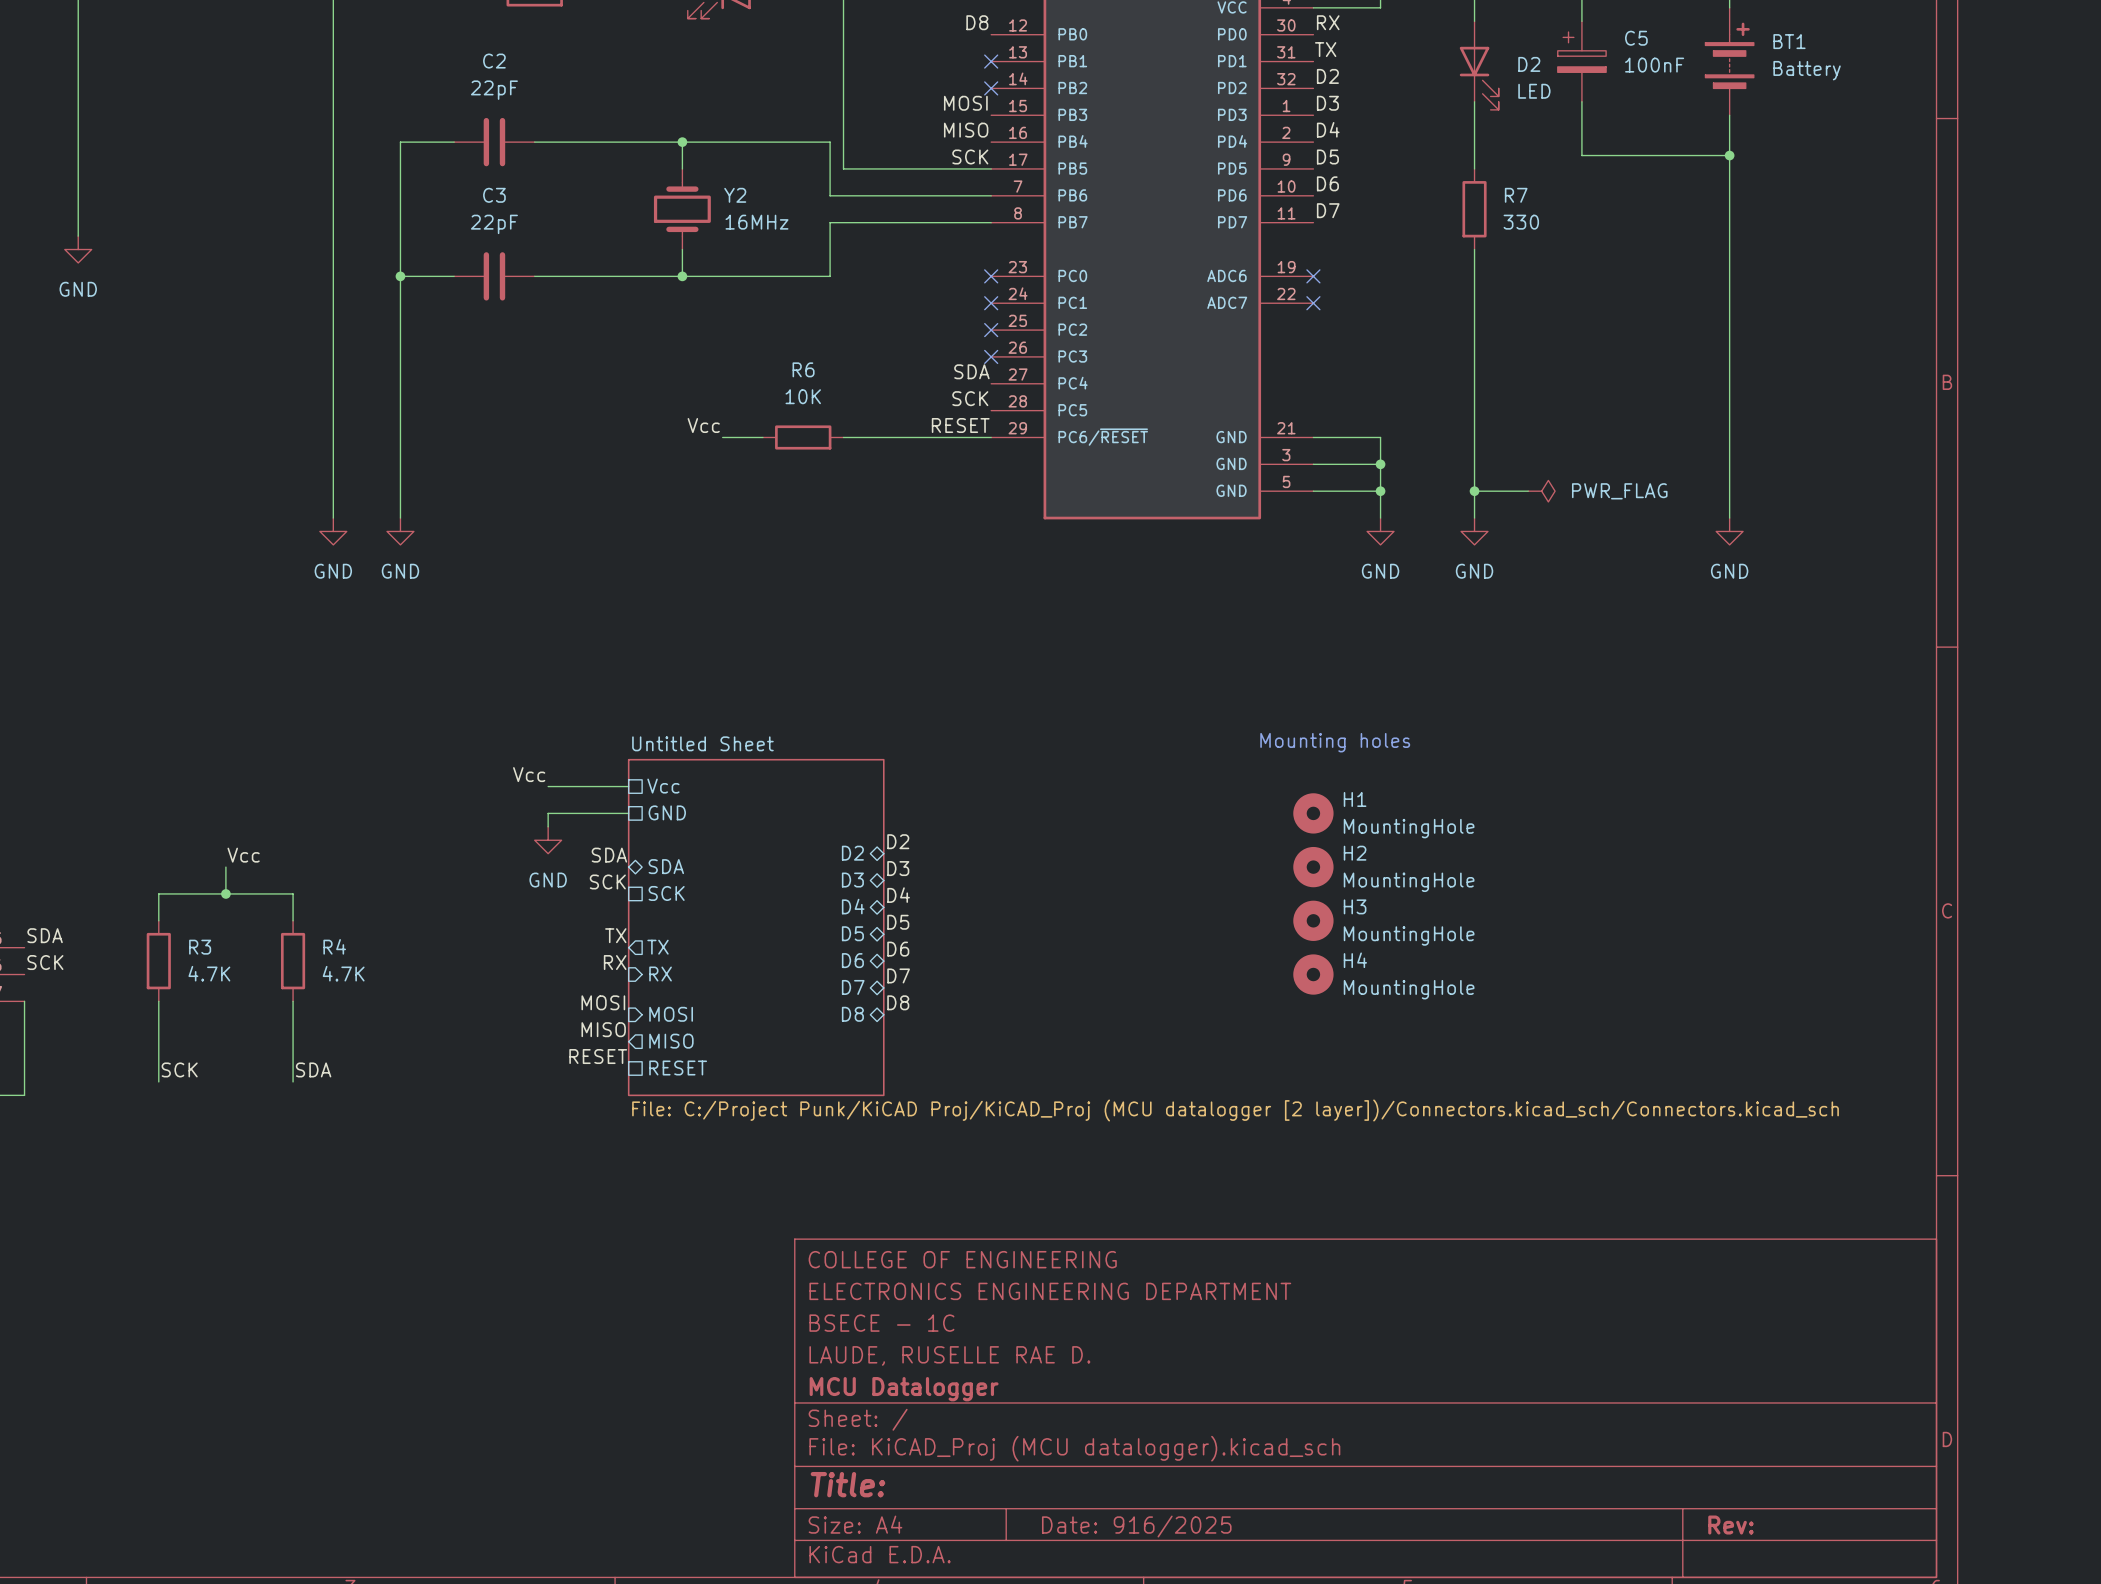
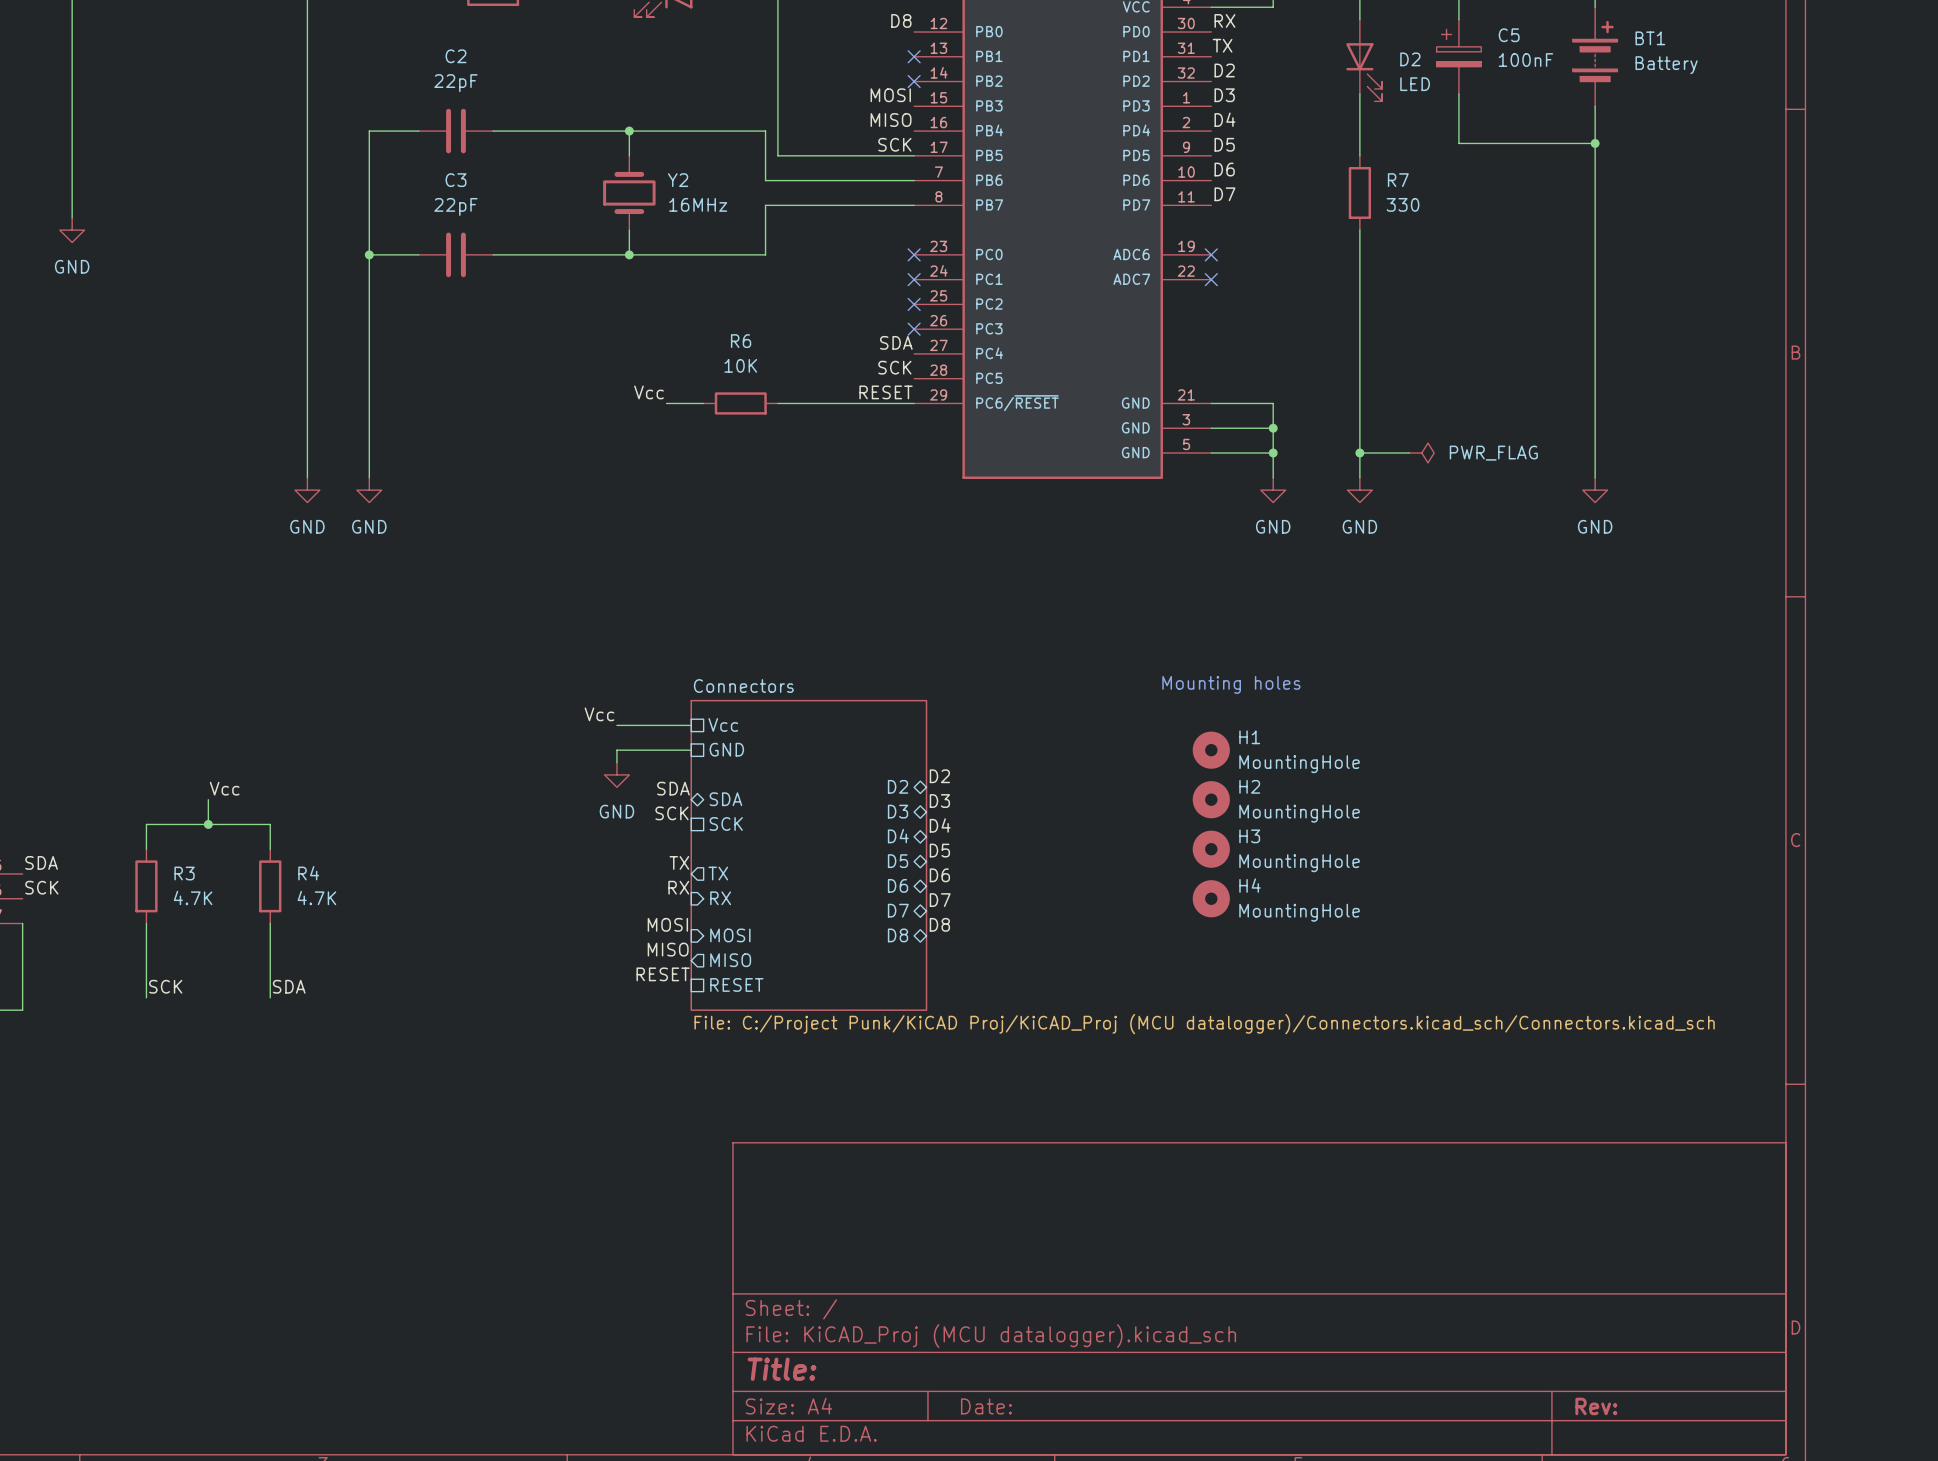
label position: Vcc (529, 774) -> Vcc (599, 714)
wire: (548, 786) (628, 786) -> (616, 725) (691, 725)
sheet pin position: Vcc (663, 786) -> Vcc (723, 724)
sheet pin position: GND (667, 812) -> GND (726, 749)
wire: (628, 813) (548, 813) (548, 826) -> (691, 750) (616, 750) (616, 762)
power symbol position: GND (548, 840) -> GND (616, 774)
label position: D2 (898, 841) -> D2 (939, 776)
sheet pin position: D2 (852, 853) -> D2 (898, 786)
label position: SDA (609, 855) -> SDA (673, 788)
sheet pin position: SDA (666, 866) -> SDA (725, 799)
label position: D3 (898, 868) -> D3 (939, 801)
sheet pin position: D3 (852, 880) -> D3 (898, 811)
label position: SCK (607, 881) -> SCK (672, 813)
sheet pin position: SCK (666, 893) -> SCK (726, 823)
label position: D4 (898, 895) -> D4 (940, 825)
sheet pin position: D4 (853, 906) -> D4 (898, 836)
label position: D5 (898, 922) -> D5 (939, 850)
sheet Untitled Sheet: File: C:/Project Punk/KiCAD Proj/KiCAD_Proj (MCU datalogger [2 layer])/Connectors.kicad_sch/Connectors.kicad_sch (756, 927) -> none
sheet Connectors: none -> File: C:/Project Punk/KiCAD Proj/KiCAD_Proj (MCU datalogger)/Connectors.kicad_sch/Connectors.kicad_sch (808, 855)
sheet pin position: D5 (852, 933) -> D5 (898, 861)
label position: TX (615, 935) -> TX (679, 862)
sheet pin position: TX (657, 947) -> TX (718, 873)
label position: D6 (898, 949) -> D6 (939, 875)
sheet pin position: D6 (852, 960) -> D6 (898, 885)
label position: RX (615, 962) -> RX (678, 887)
sheet pin position: RX (660, 974) -> RX (720, 898)
label position: D7 (898, 975) -> D7 (940, 900)
sheet pin position: D7 (853, 987) -> D7 (898, 910)
label position: MOSI (603, 1002) -> MOSI (667, 924)
label position: D8 (898, 1002) -> D8 (939, 924)
sheet pin position: MOSI (671, 1014) -> MOSI (730, 935)
sheet pin position: D8 (852, 1014) -> D8 (898, 935)
label position: MISO (603, 1029) -> MISO (668, 949)
sheet pin position: MISO (671, 1041) -> MISO (730, 960)
label position: RESET (598, 1056) -> RESET (663, 974)
sheet pin position: RESET (678, 1068) -> RESET (736, 984)
title block: COLLEGE OF ENGINEERING (962, 1259) -> none
title block: ELECTRONICS ENGINEERING DEPARTMENT (1050, 1291) -> none
title block: BSECE - 1C (881, 1323) -> none
title block: LAUDE, RUSELLE RAE D. (949, 1355) -> none
title block: MCU Datalogger (904, 1389) -> none
title block: Date: 916/2025 (1136, 1526) -> Date: (986, 1406)

